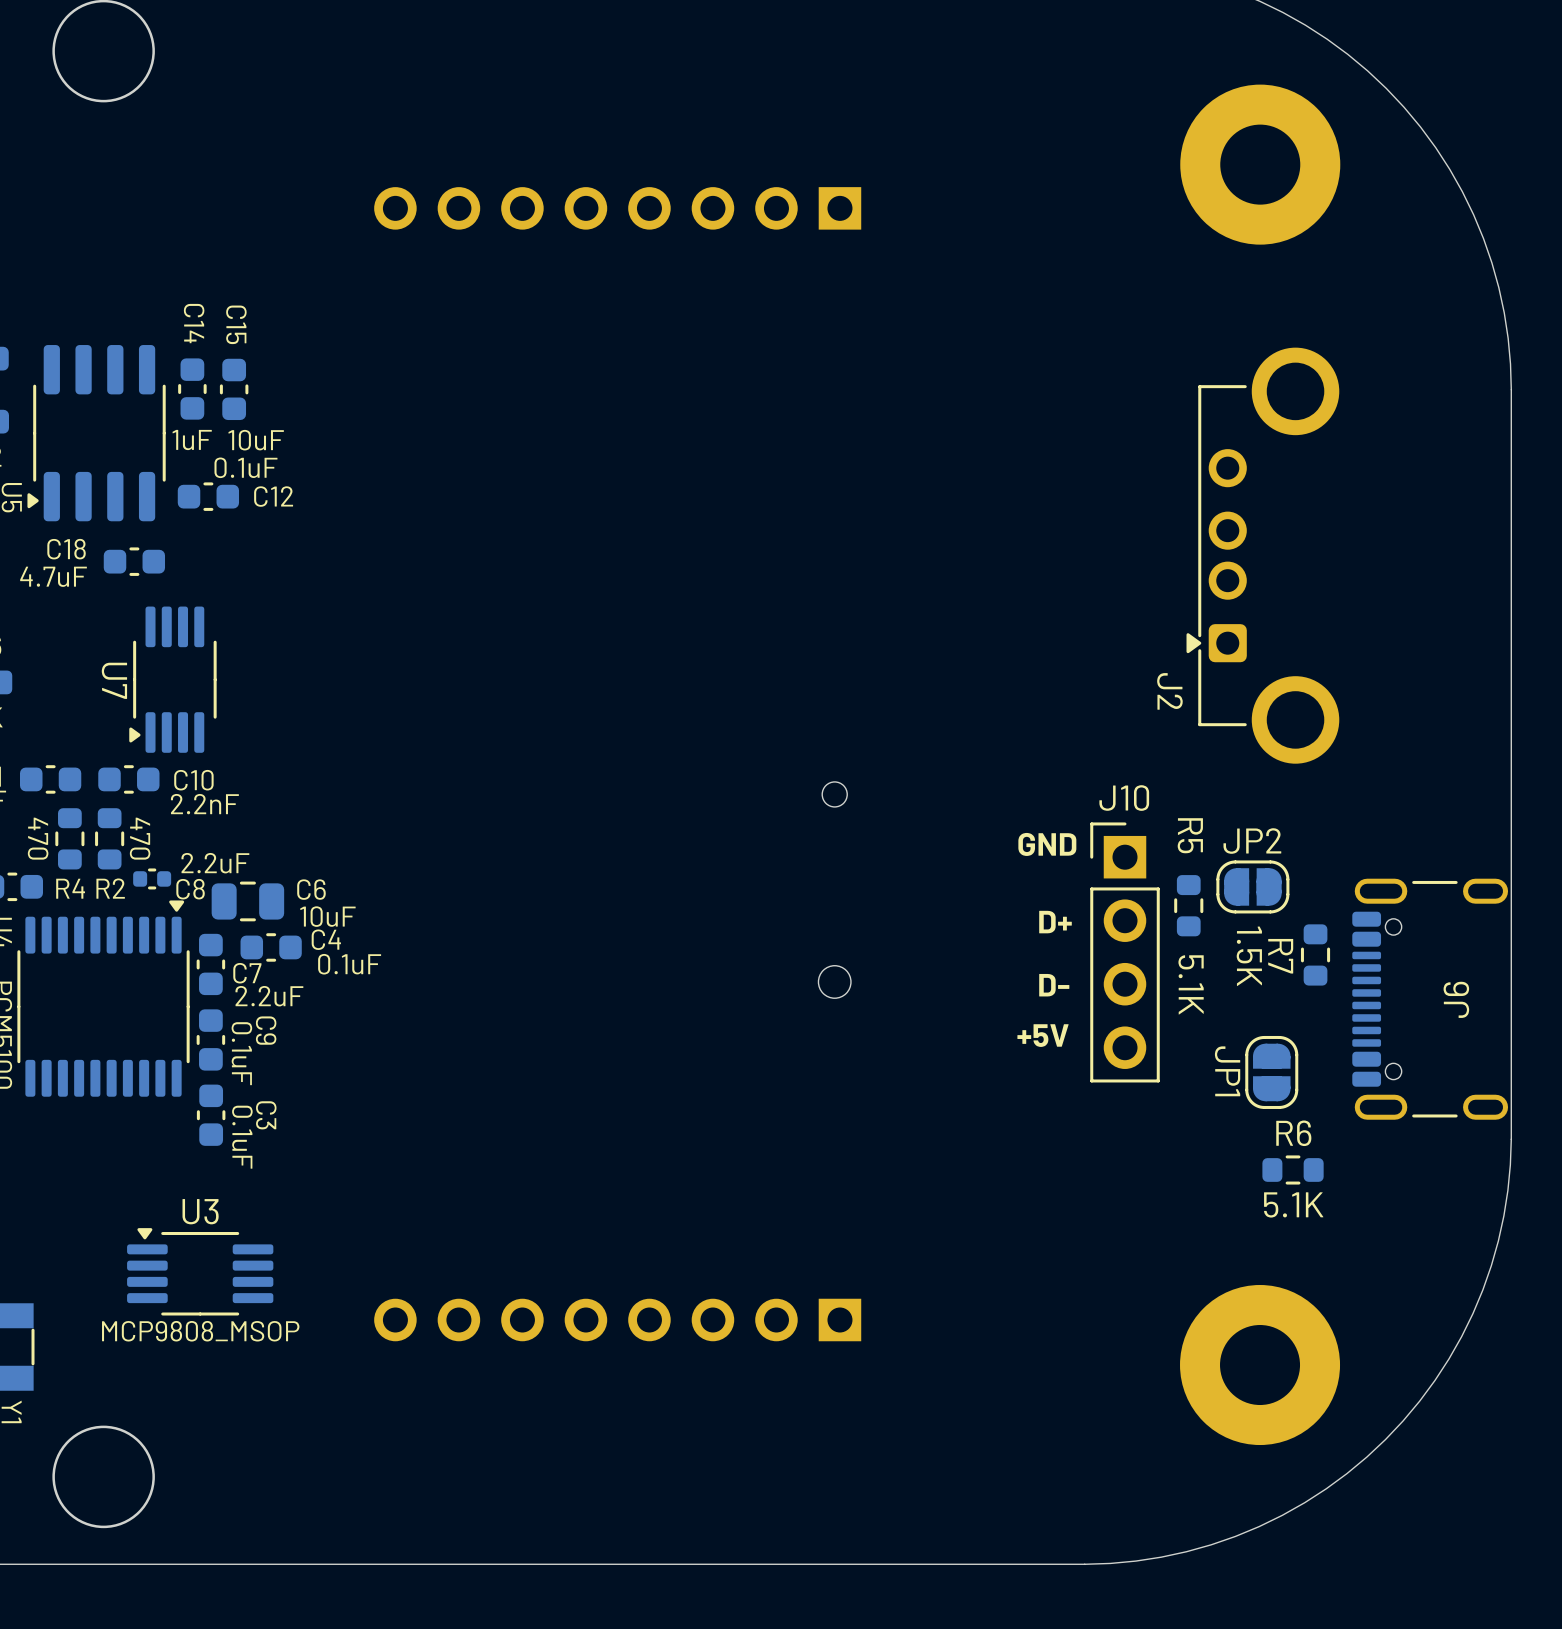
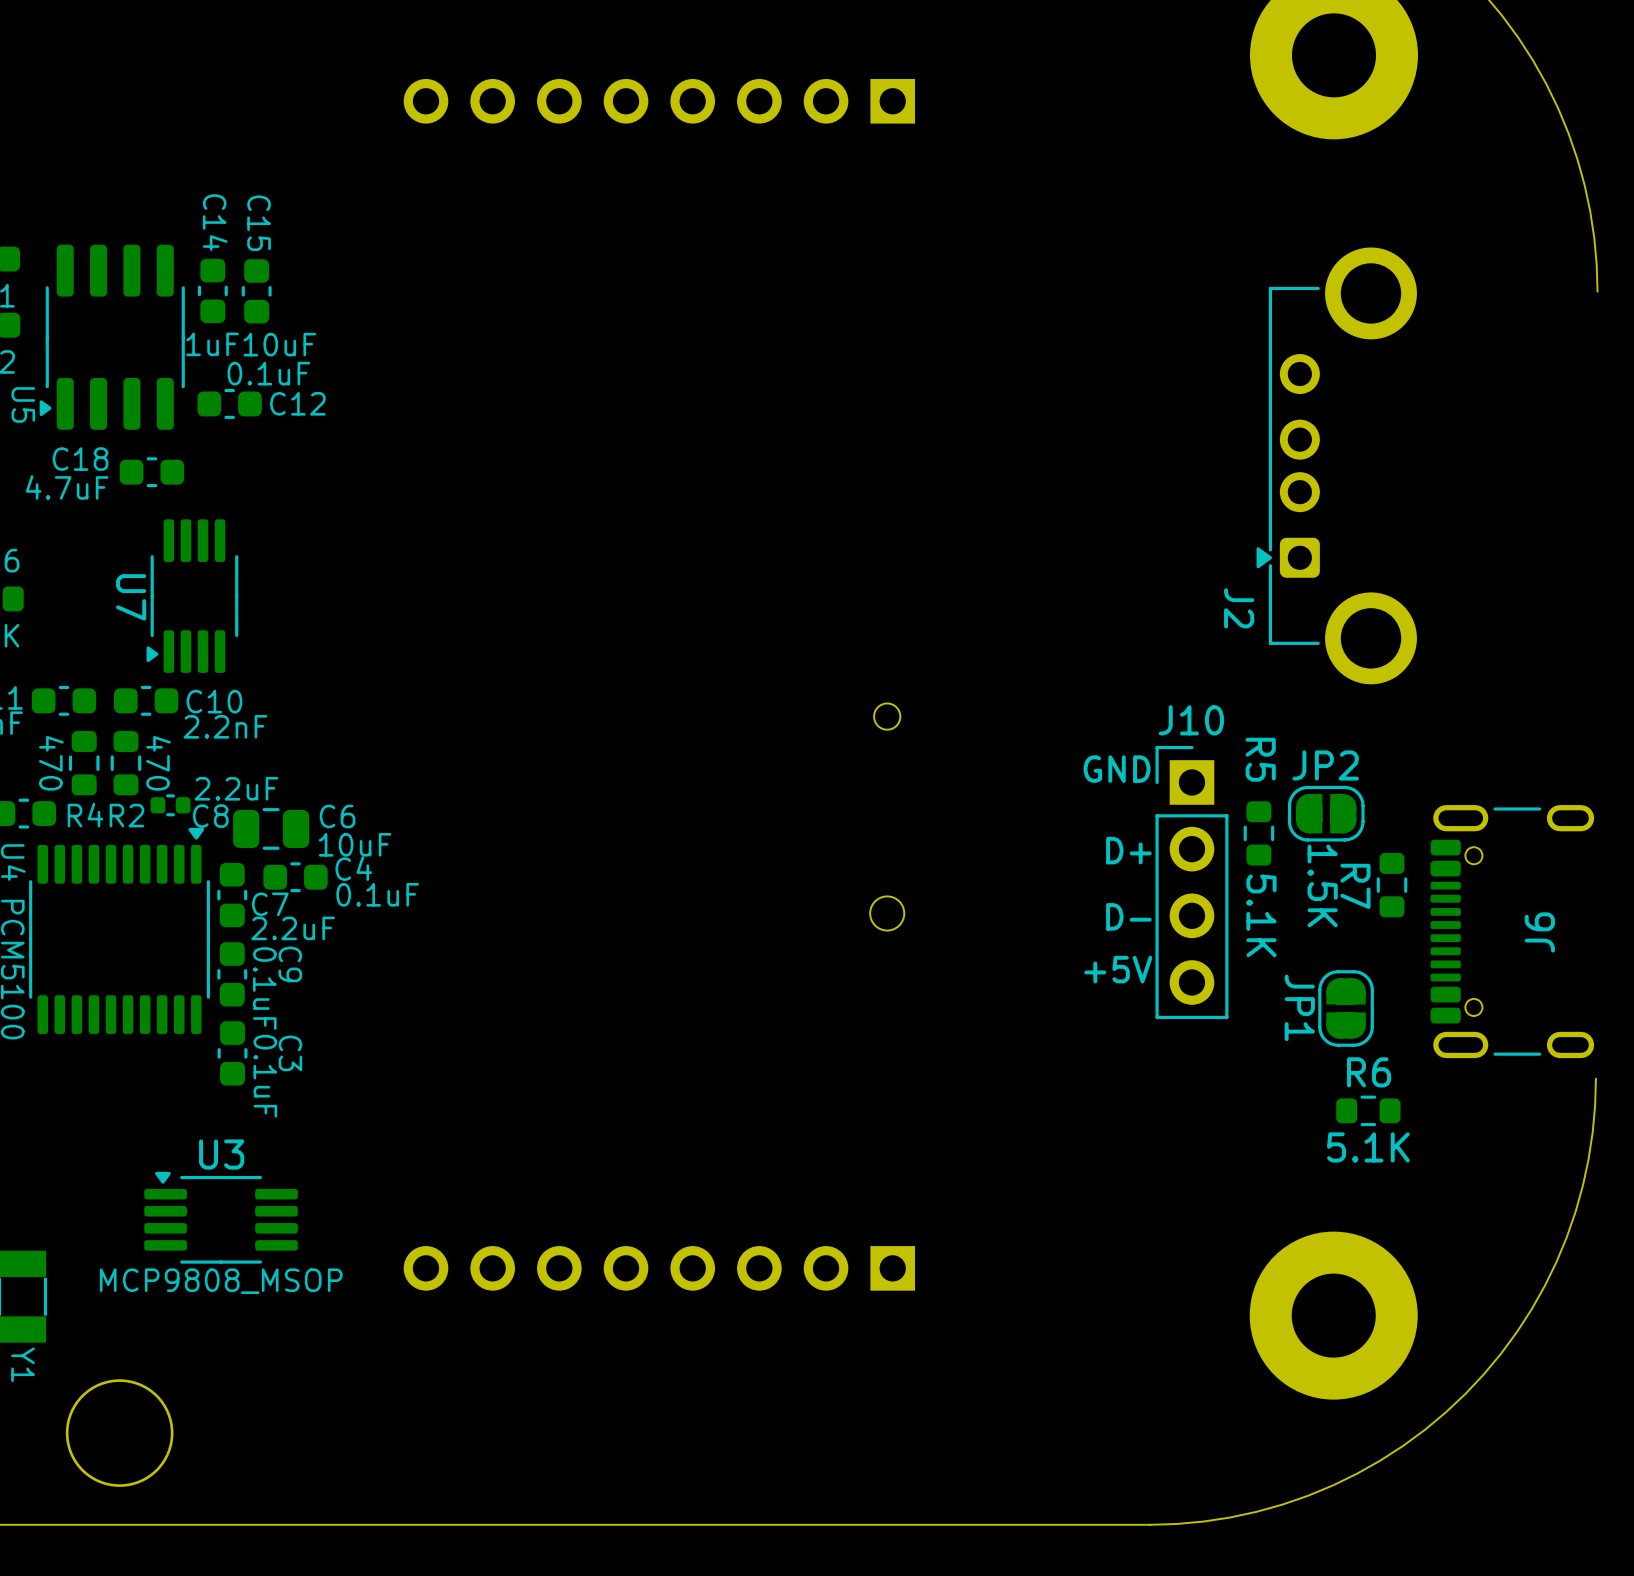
board edge: (1511, 389) (1511, 1139) (1510, 1164) (1503, 1215) (1498, 1240) (1482, 1289) (1461, 1336) (1448, 1359) (1419, 1401) (1385, 1439) (1366, 1457) (1326, 1488) (1304, 1502) (1259, 1526) (1211, 1544) (1161, 1557) (1135, 1561) (1084, 1564) -> (1595, 1078) (1592, 1132) (1582, 1185) (1566, 1236) (1556, 1261) (1531, 1309) (1516, 1332) (1500, 1353) (1465, 1394) (1445, 1412) (1403, 1445) (1357, 1473) (1307, 1495) (1282, 1504) (1230, 1517) (1203, 1521) (1149, 1524)

